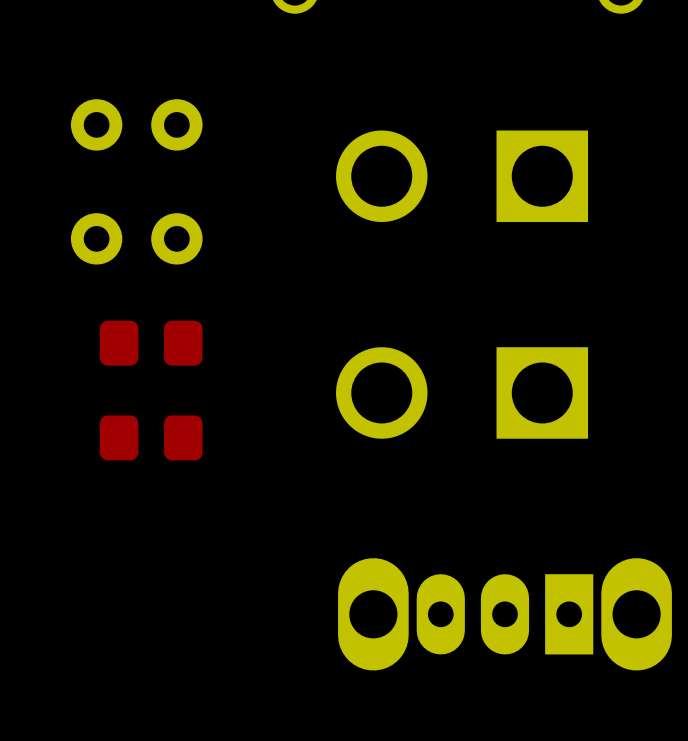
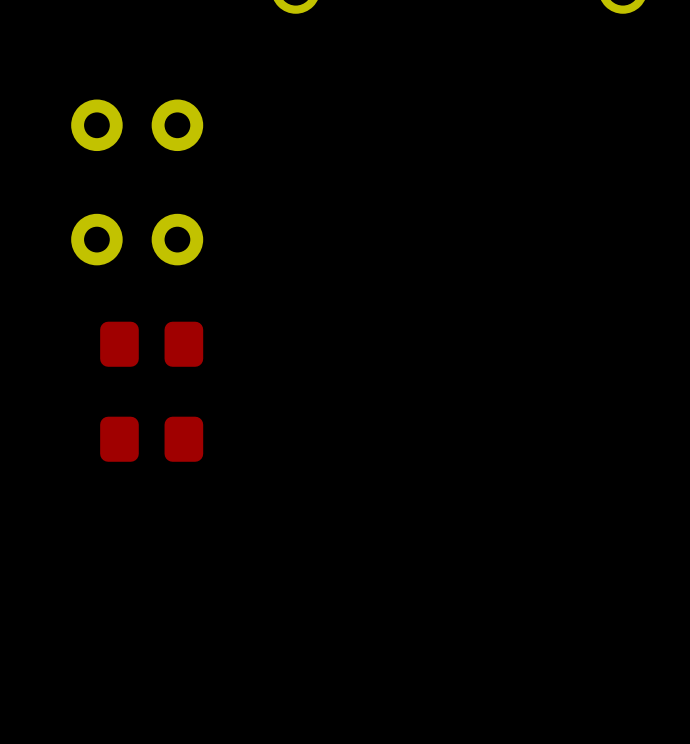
part: (462, 176) -> none
part: (462, 392) -> none
part: (504, 614) -> none

